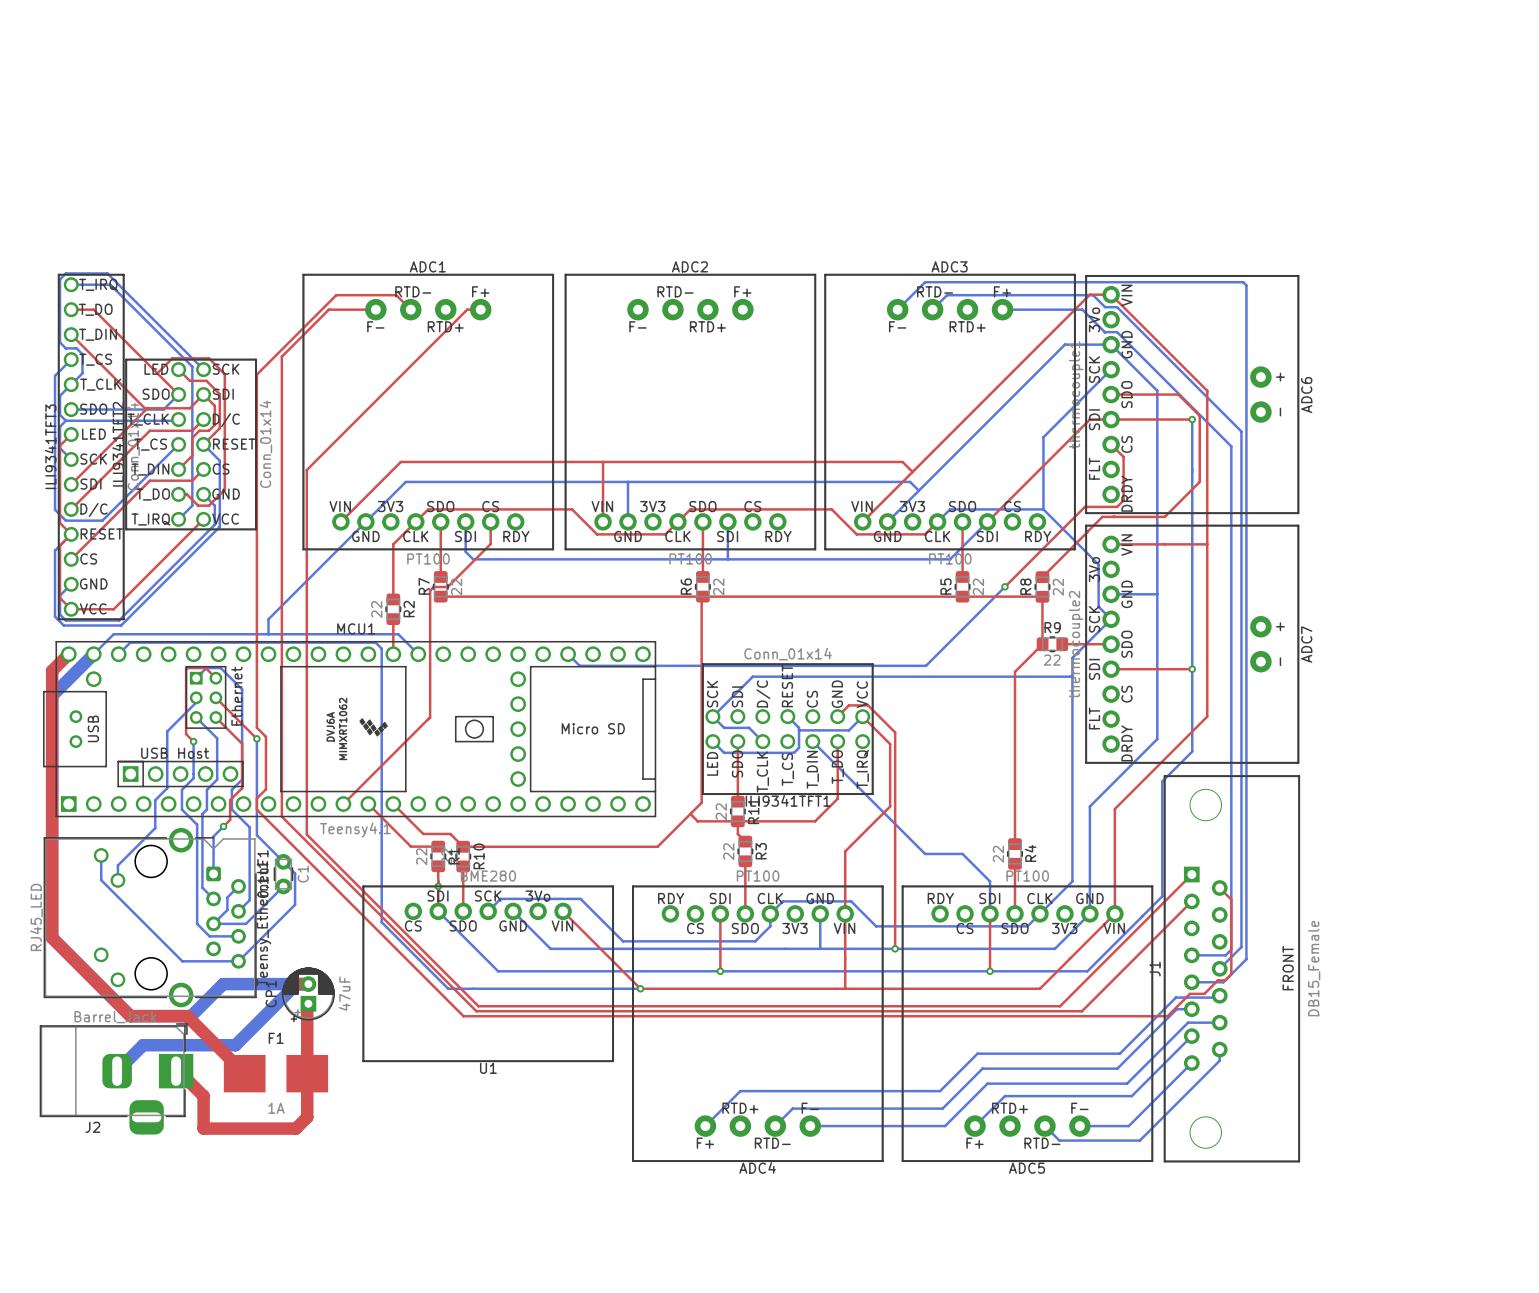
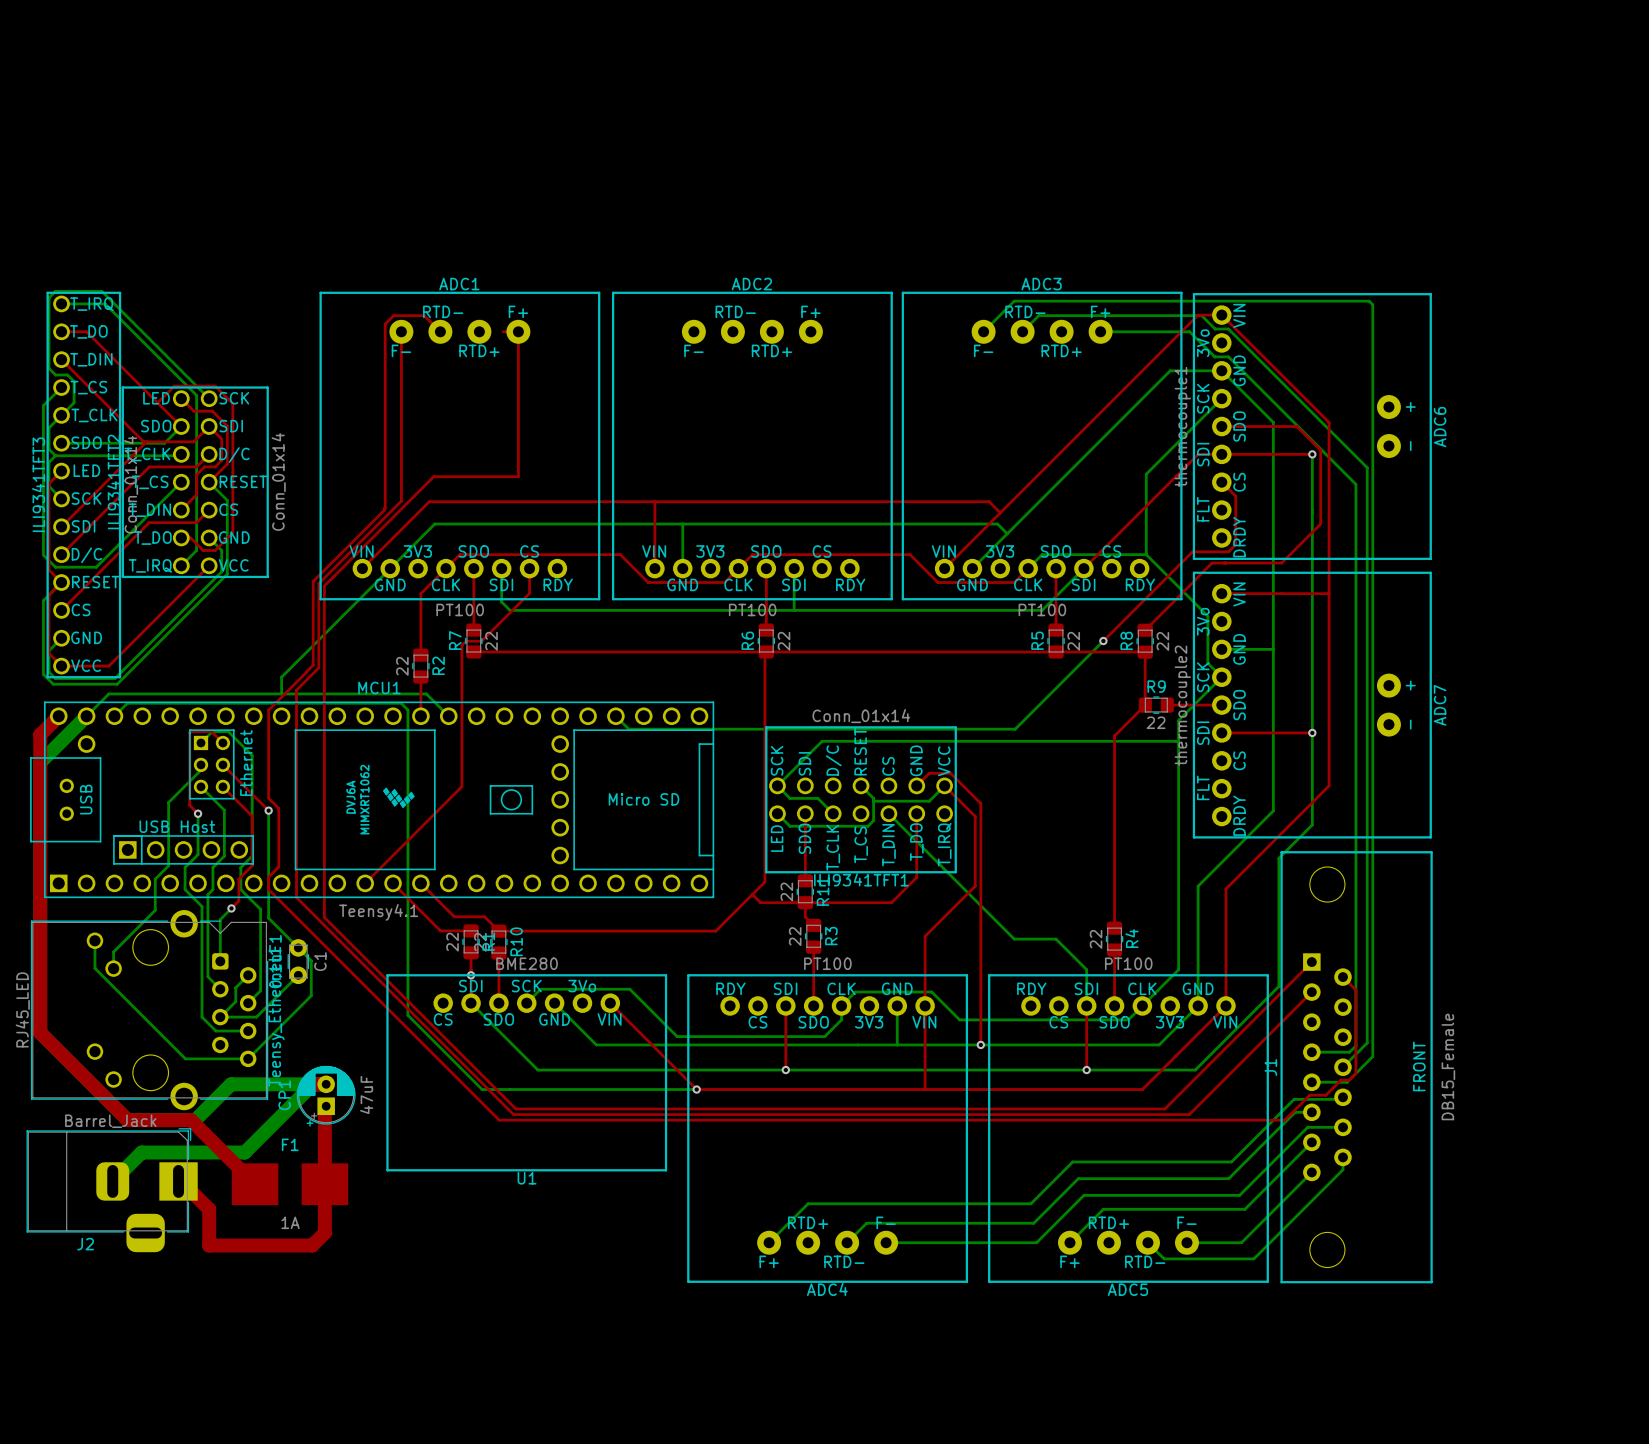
top track: (368, 295) (336, 295) (256, 374) (256, 648) -> (393, 315) (385, 324) (384, 509) (313, 581) (313, 665) (268, 710)
top track: (375, 309) (328, 309) (281, 356) (281, 630) -> (401, 331) (401, 501) (318, 583) (318, 667) (296, 690)
top track: (467, 309) (306, 470) (306, 537) -> (518, 331) (518, 476) (433, 476) (324, 586)

